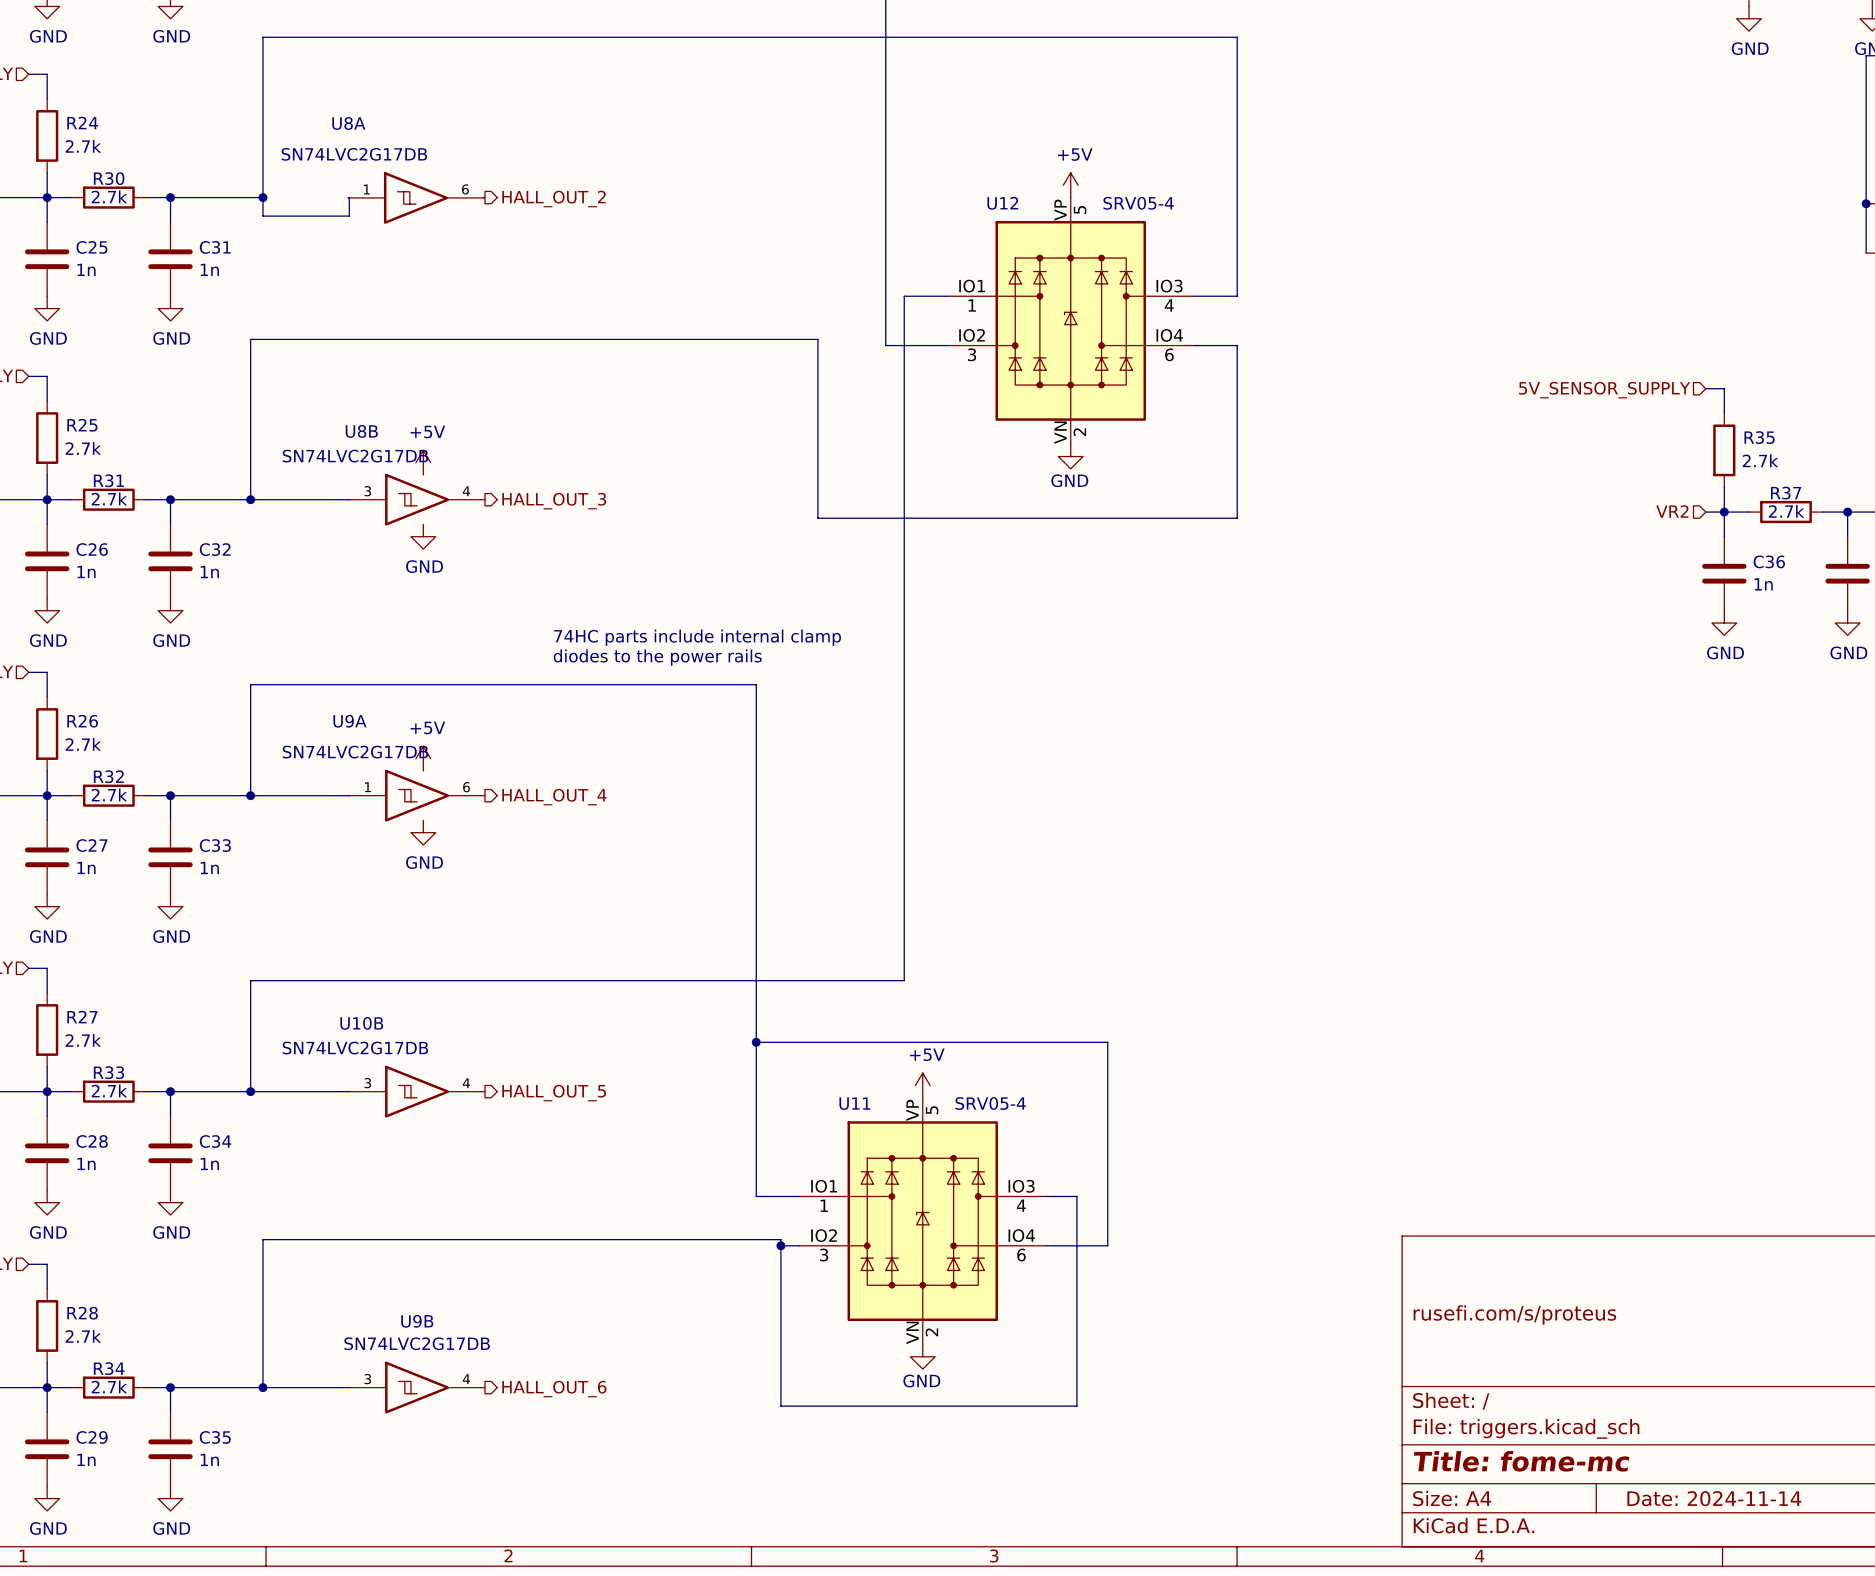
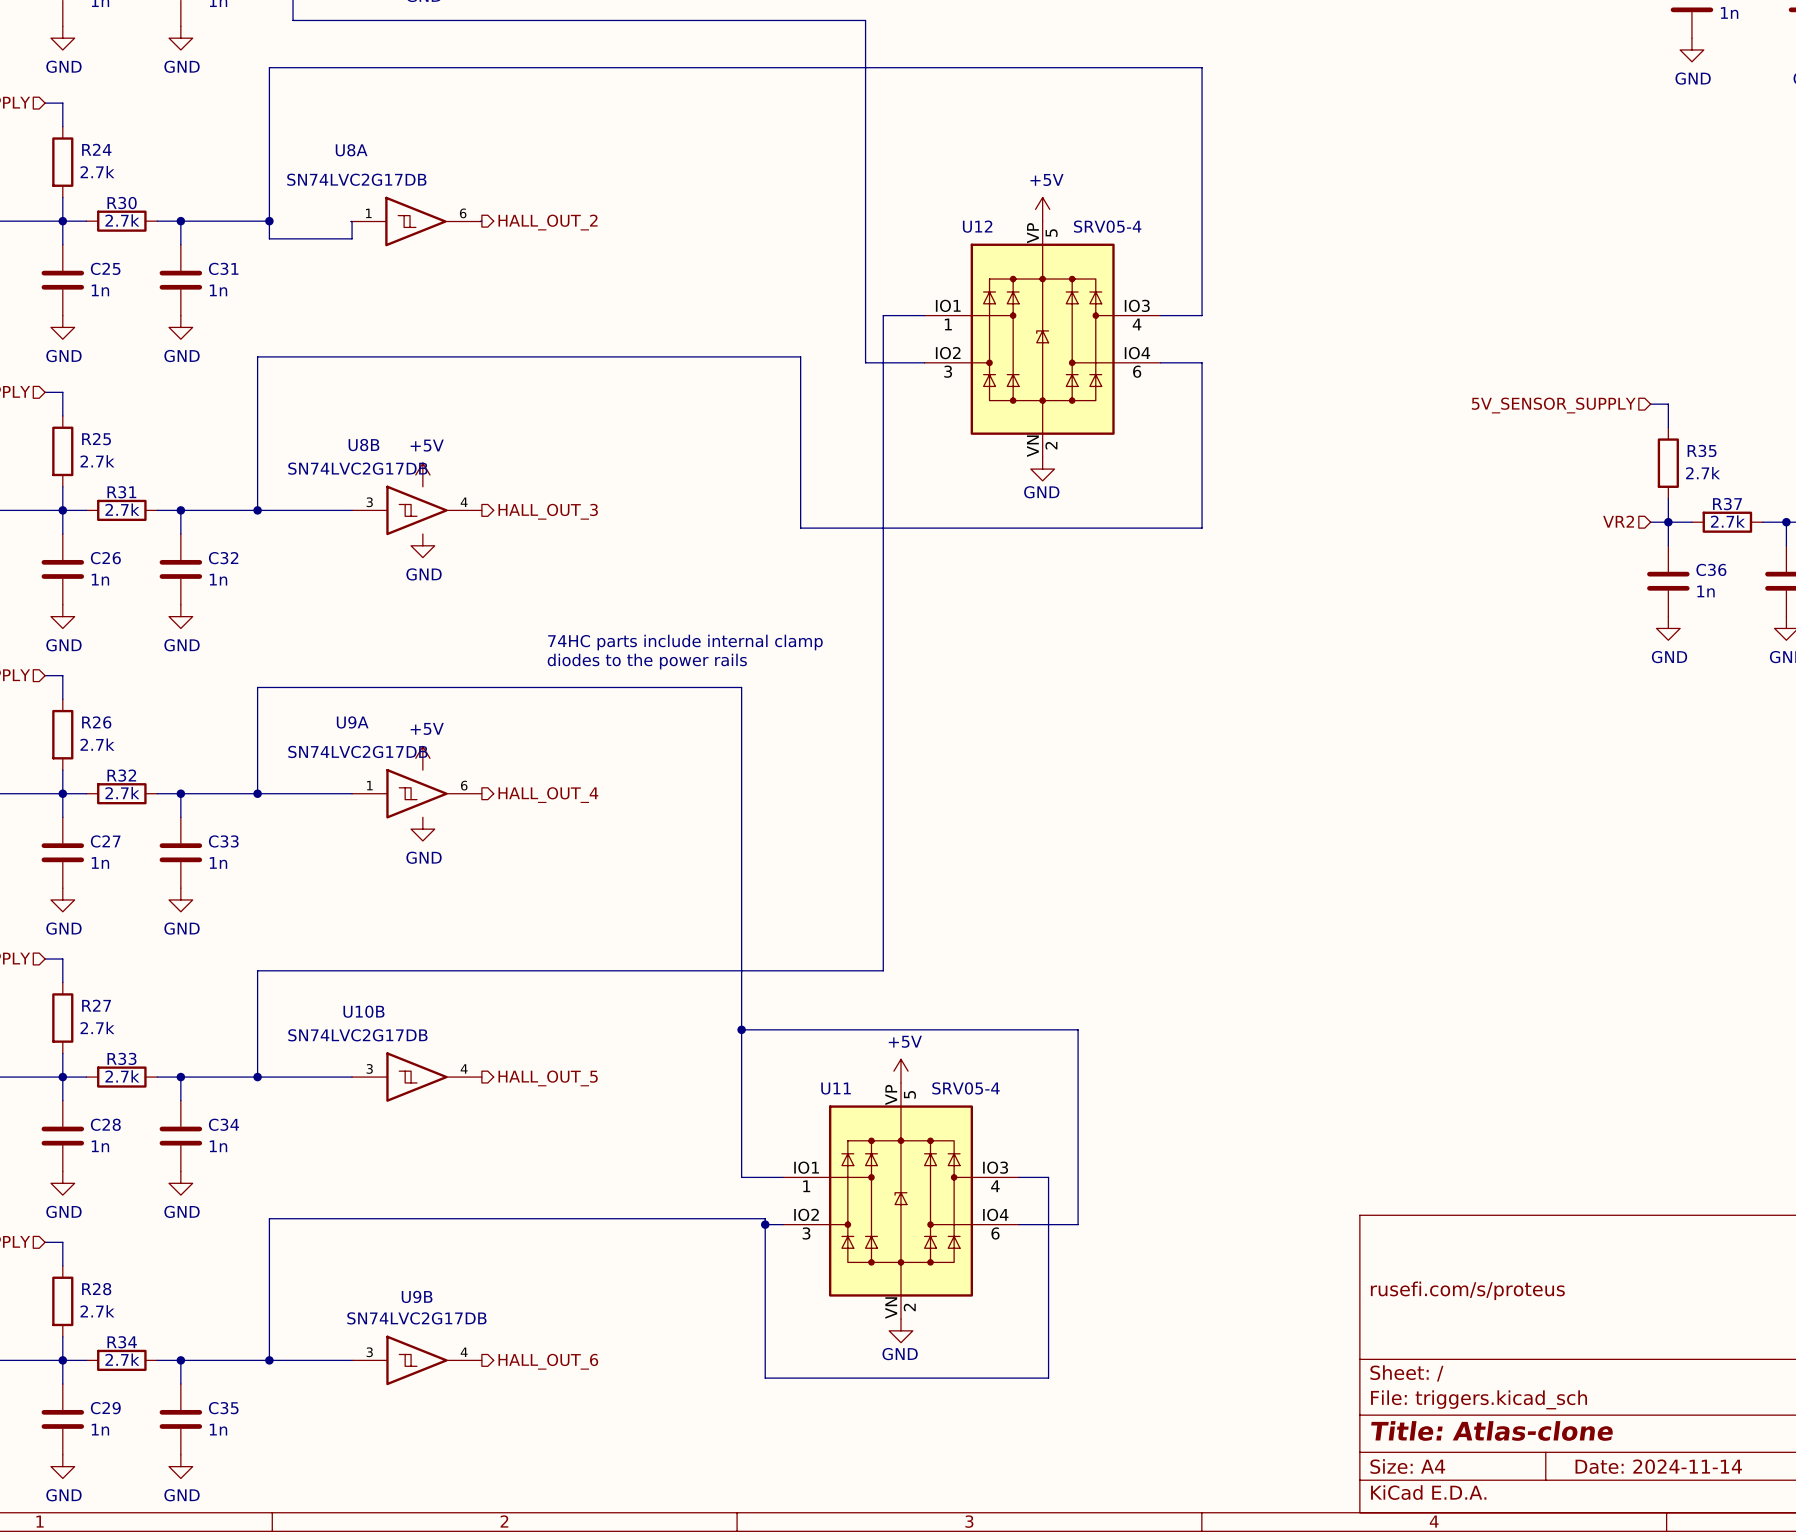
title block: Title: fome-mc (1521, 1461) -> Title: Atlas-clone (1492, 1430)

